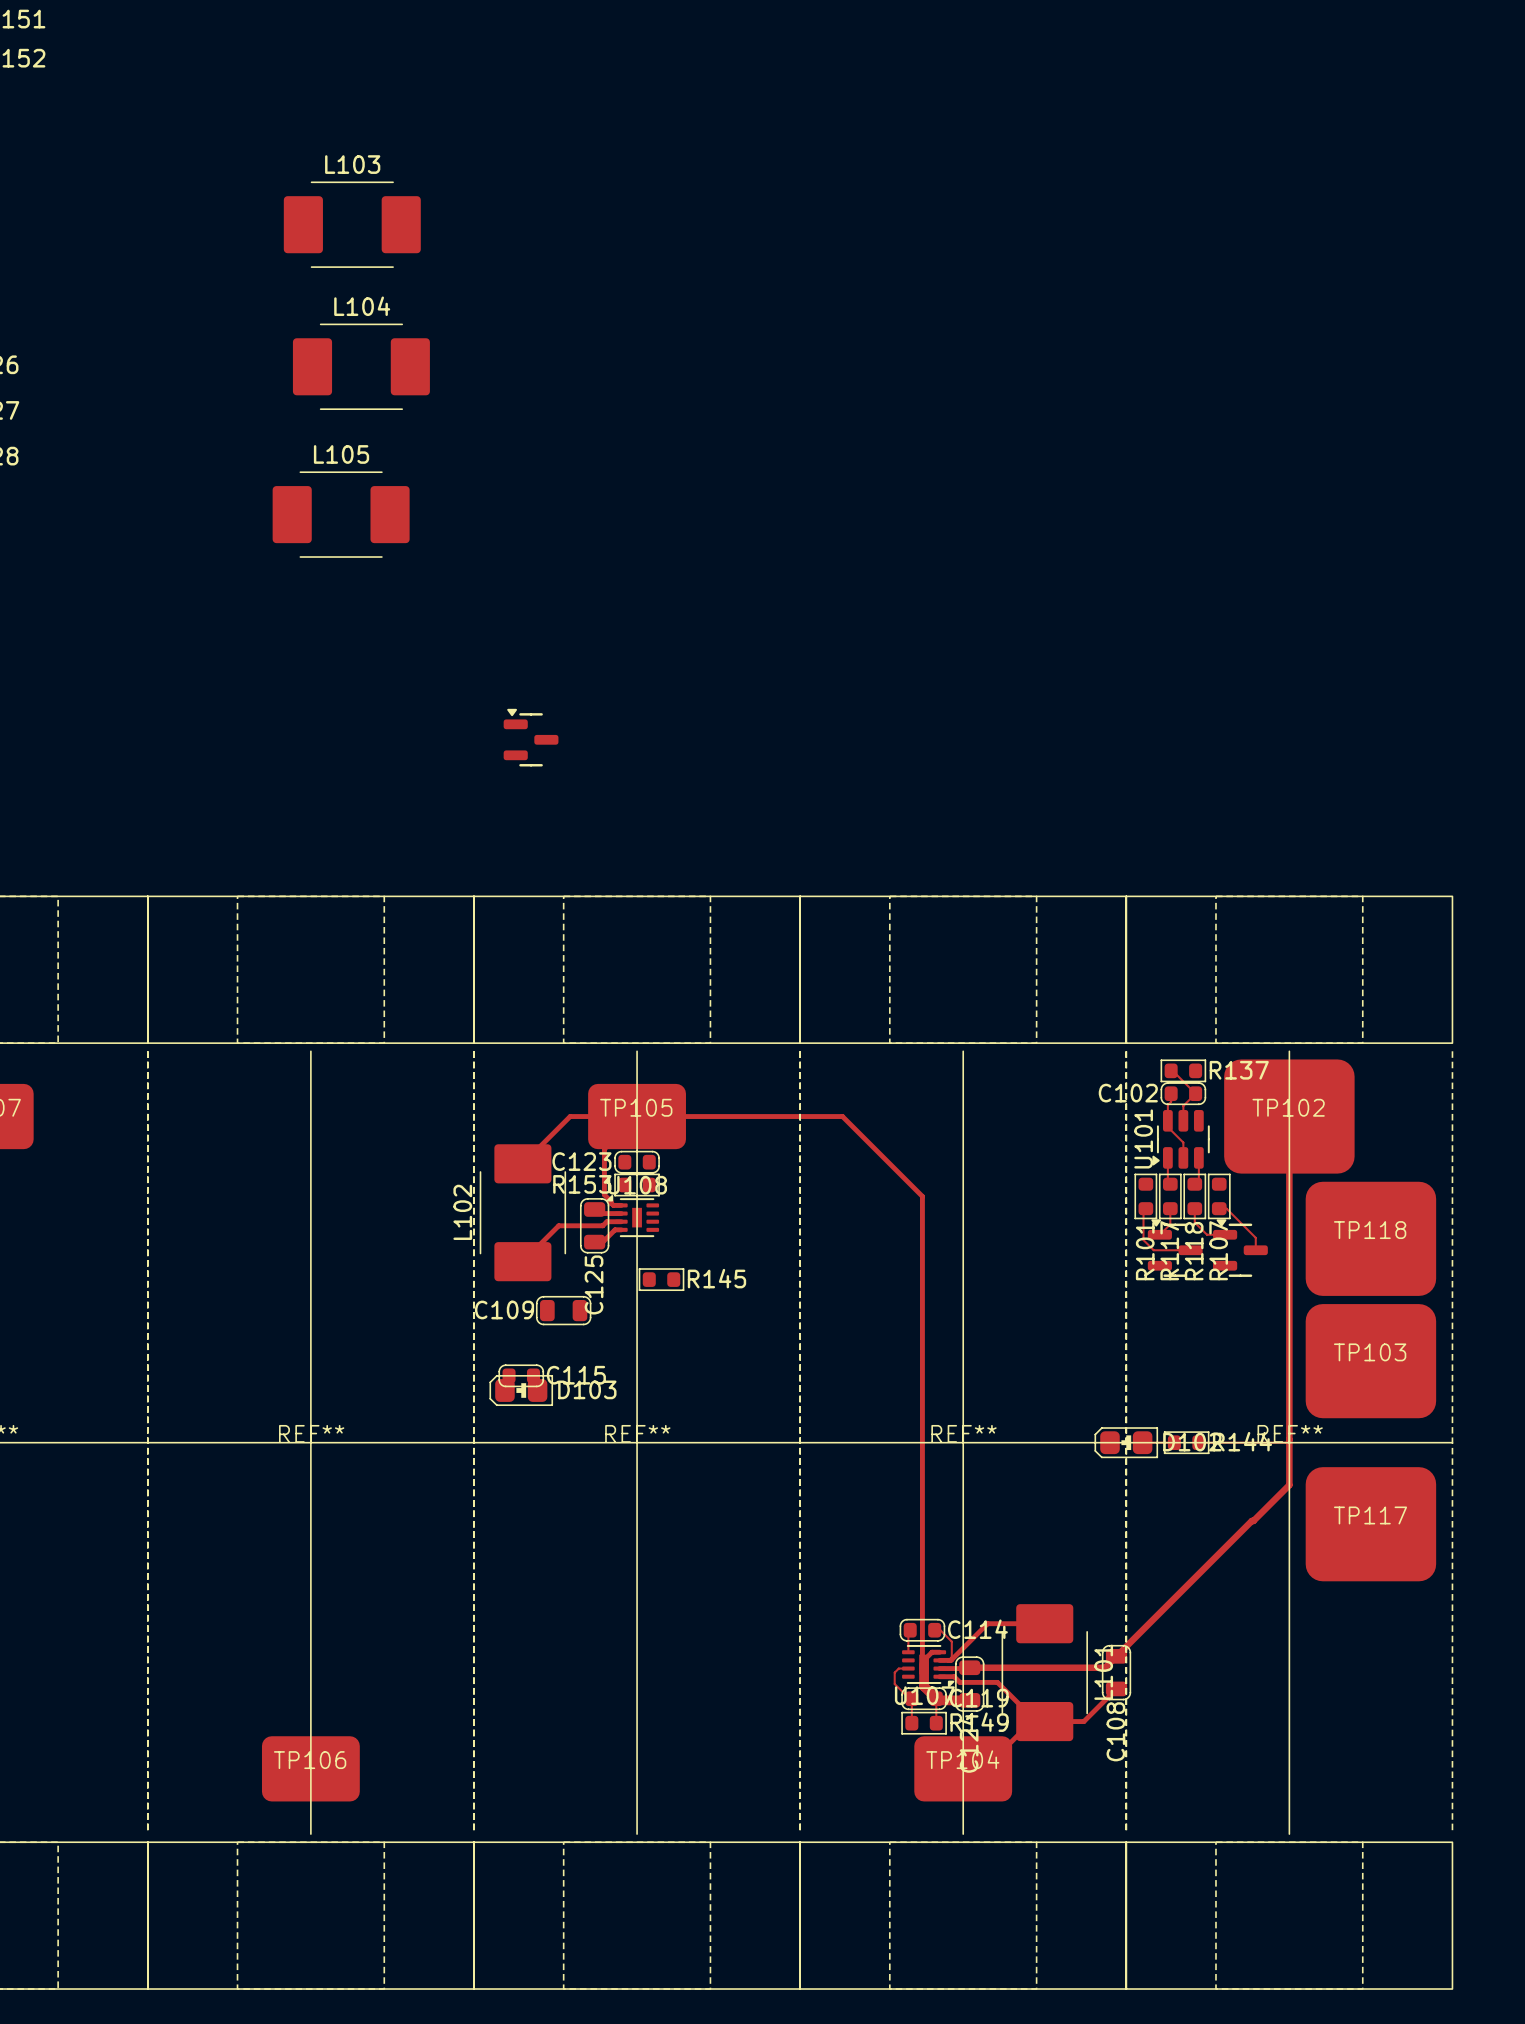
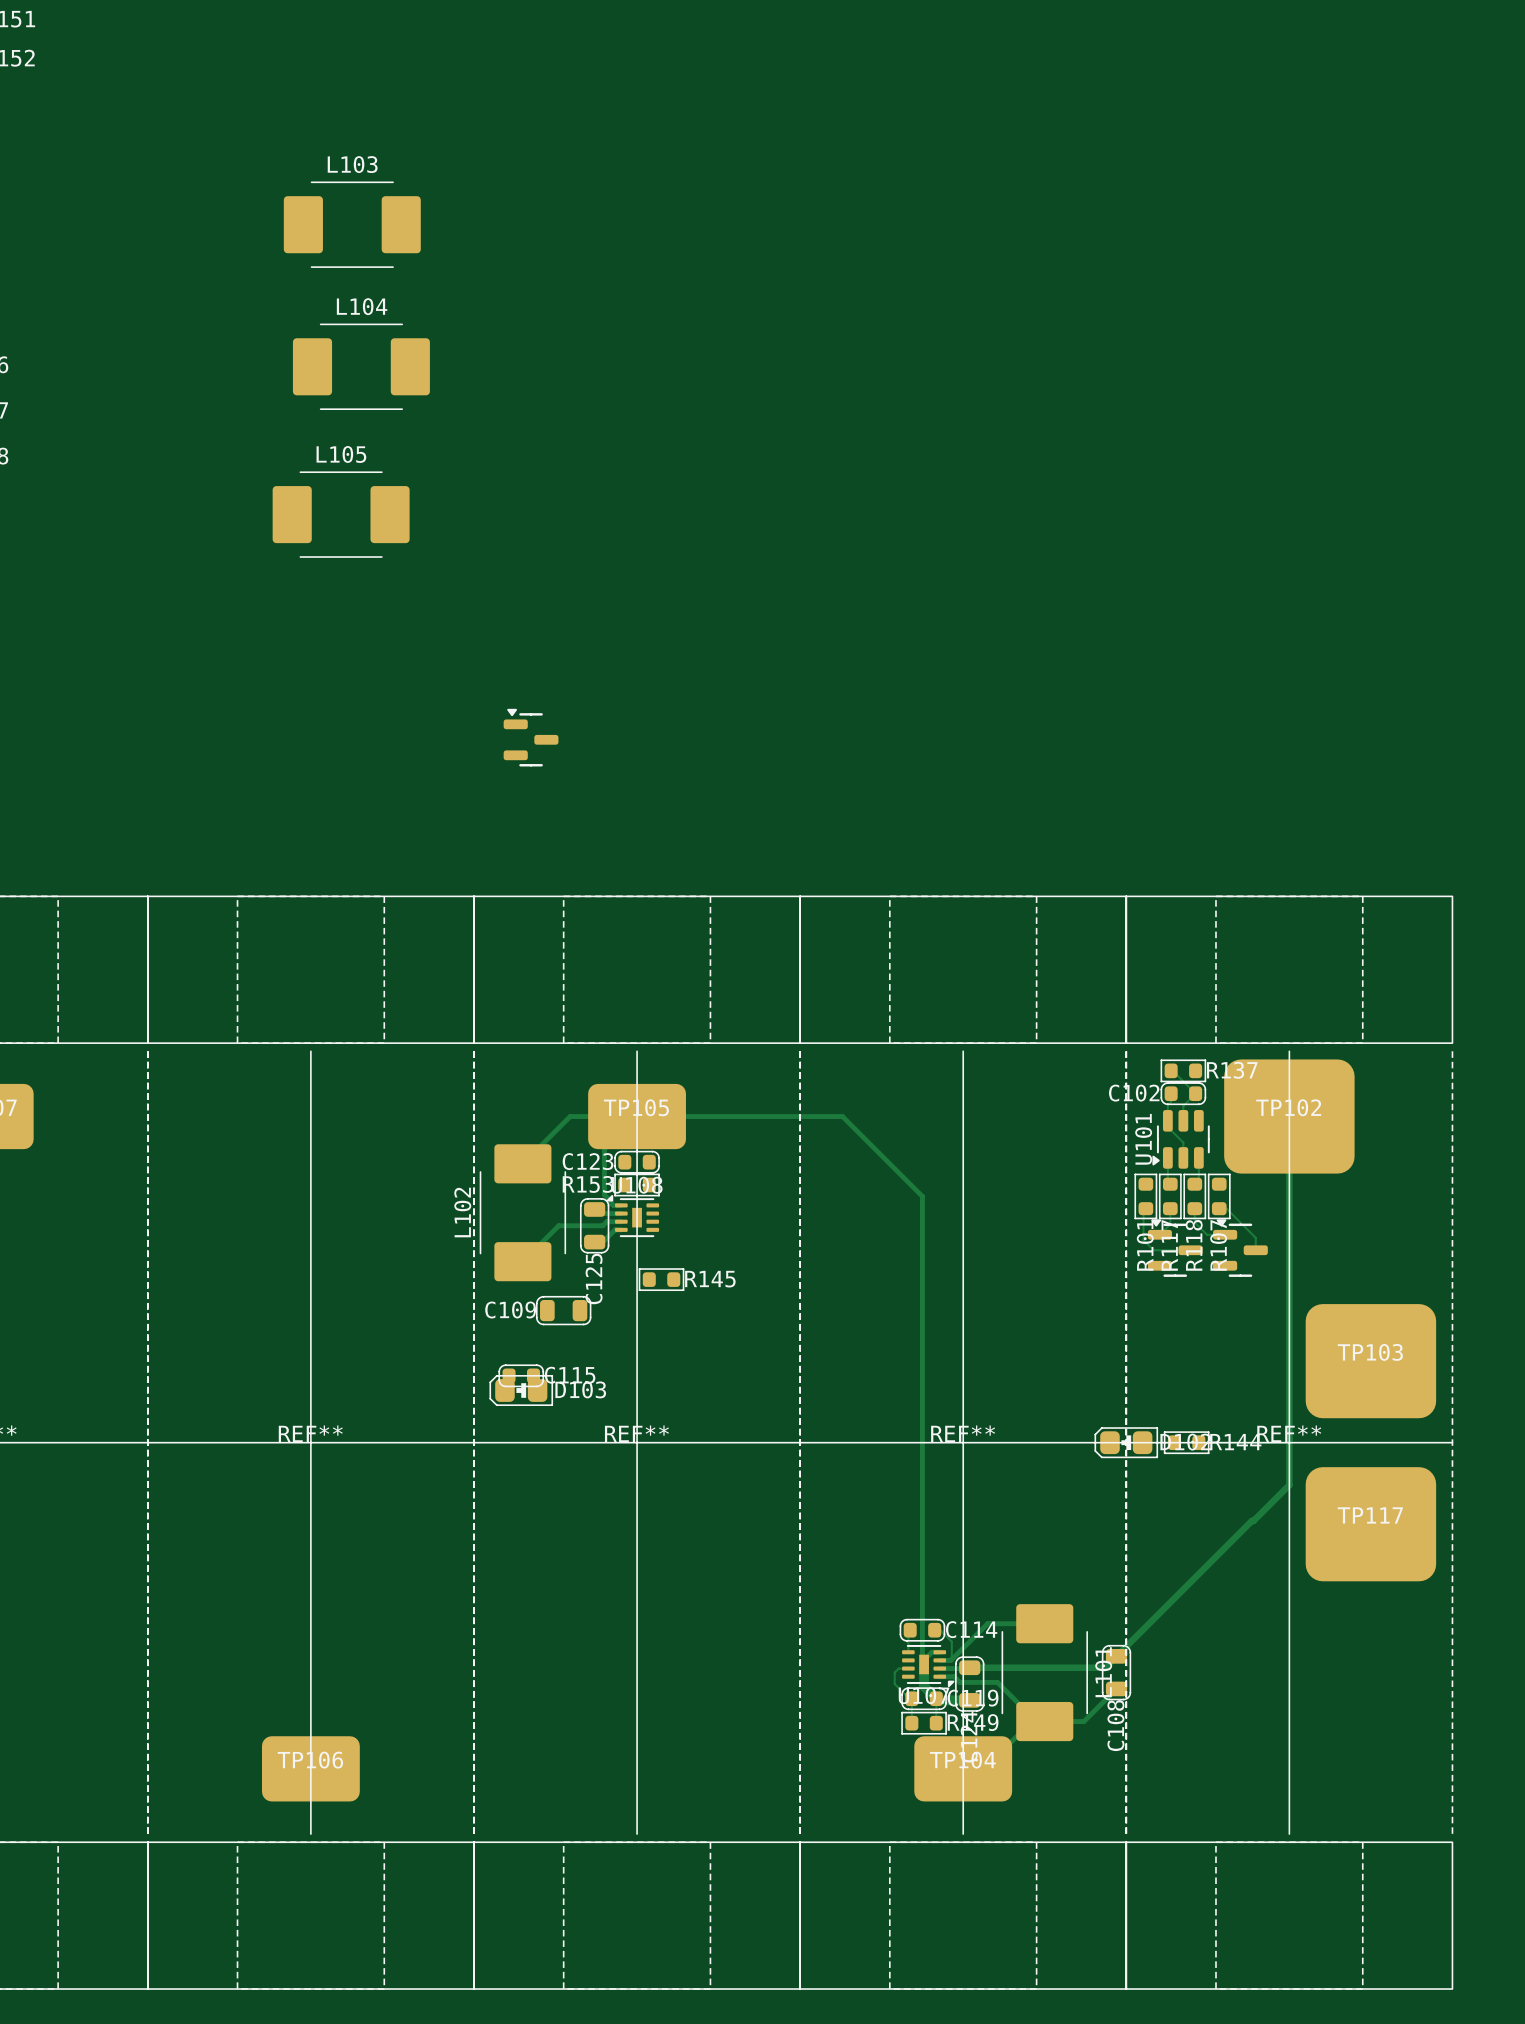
TP118: (1370, 1238) -> none

